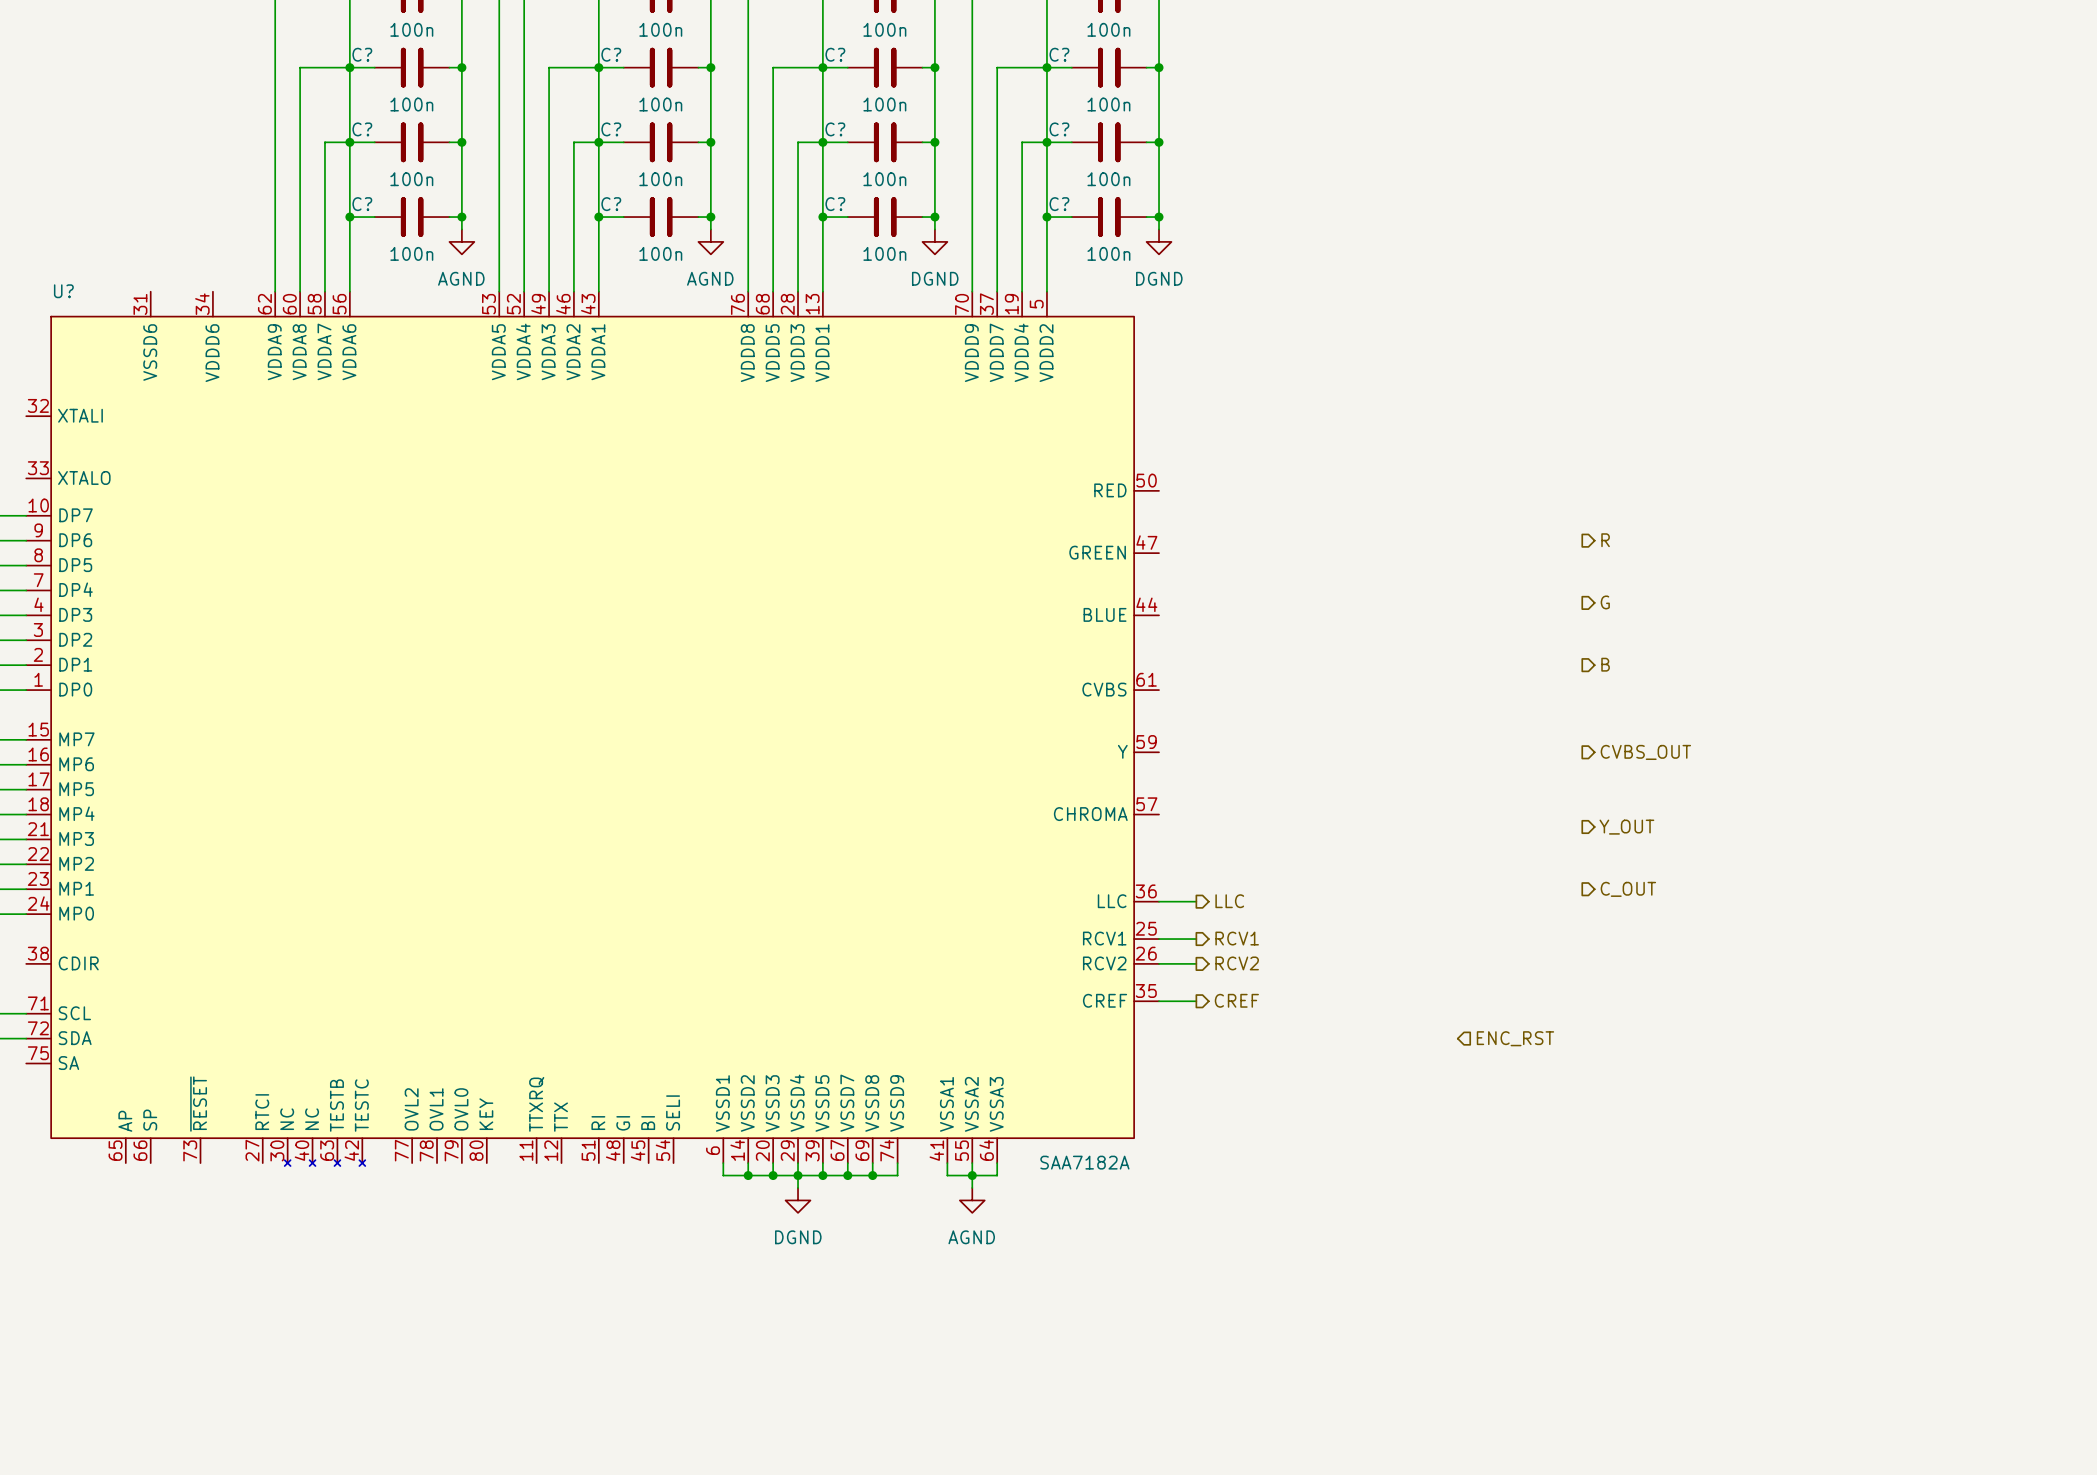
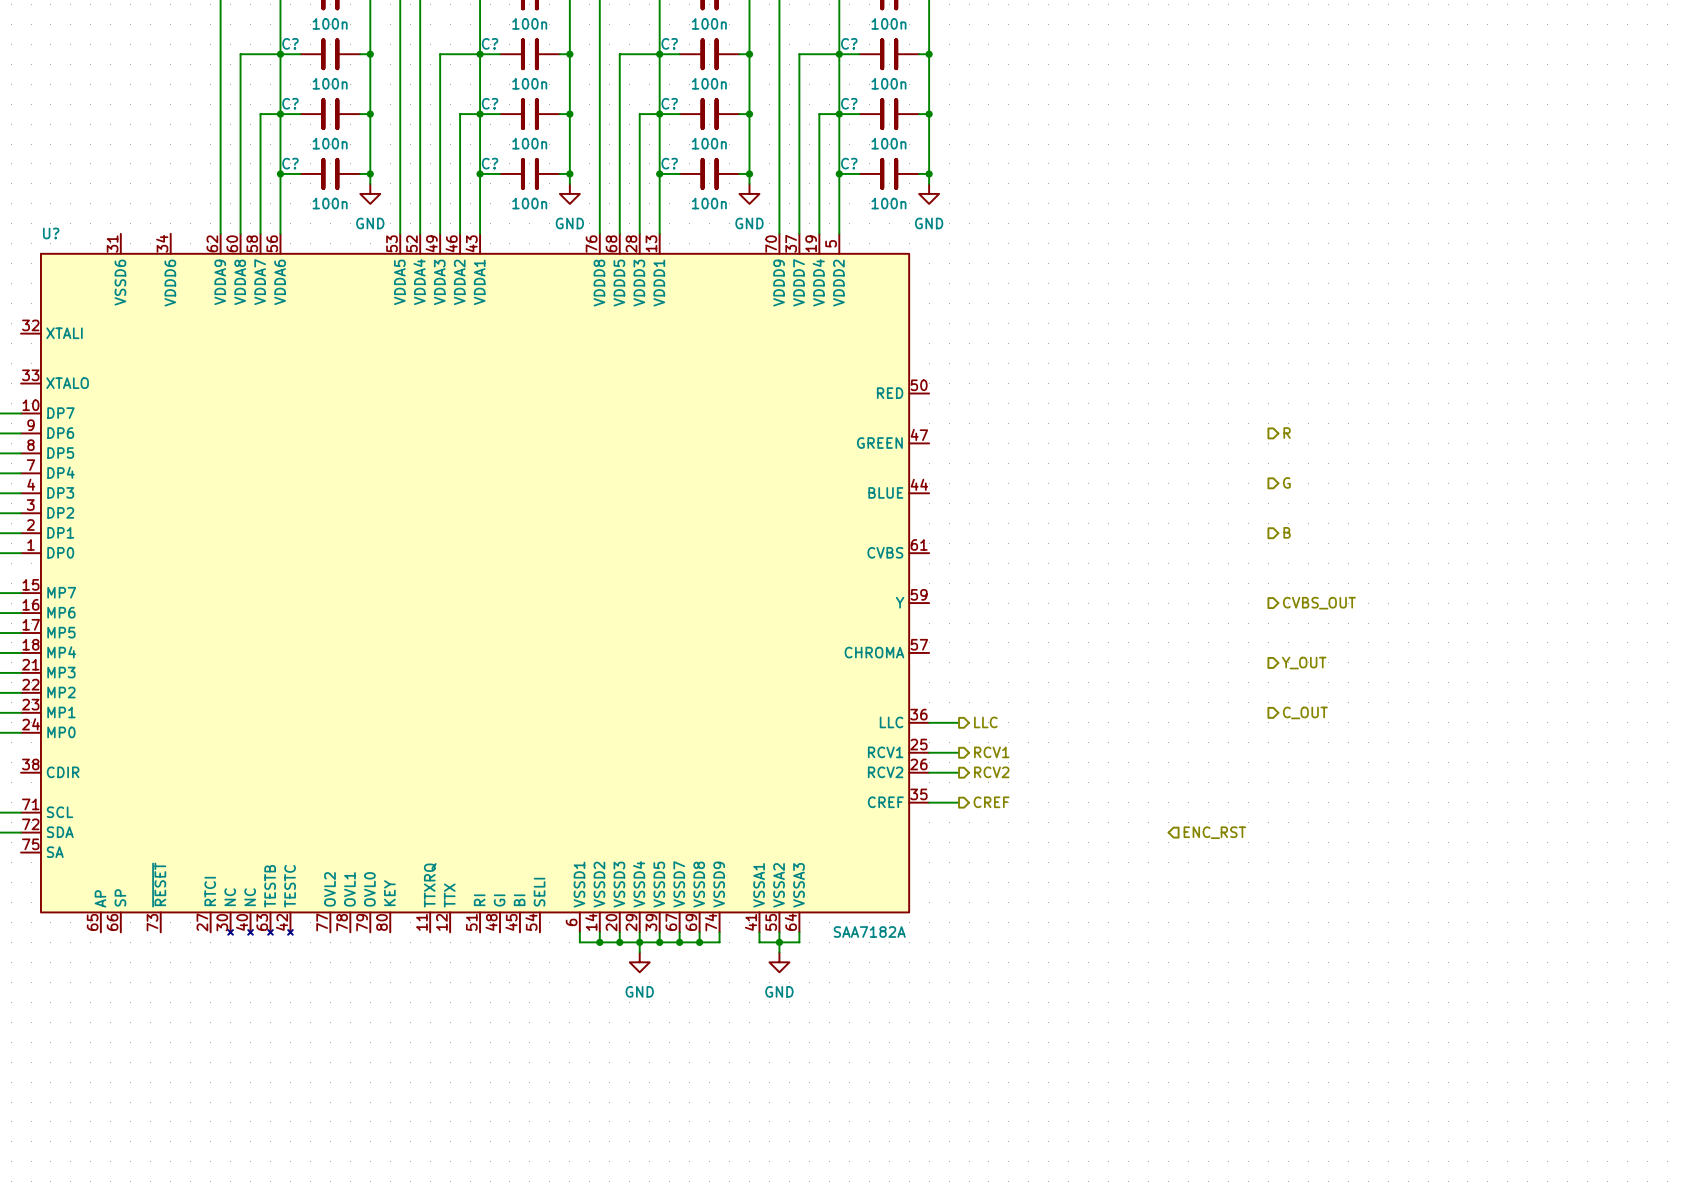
power symbol: AGND (461, 241) -> GND (370, 193)
power symbol: AGND (710, 241) -> GND (569, 193)
power symbol: DGND (934, 241) -> GND (749, 193)
power symbol: DGND (1159, 241) -> GND (929, 193)
power symbol: DGND (798, 1200) -> GND (639, 962)
power symbol: AGND (972, 1200) -> GND (779, 962)

